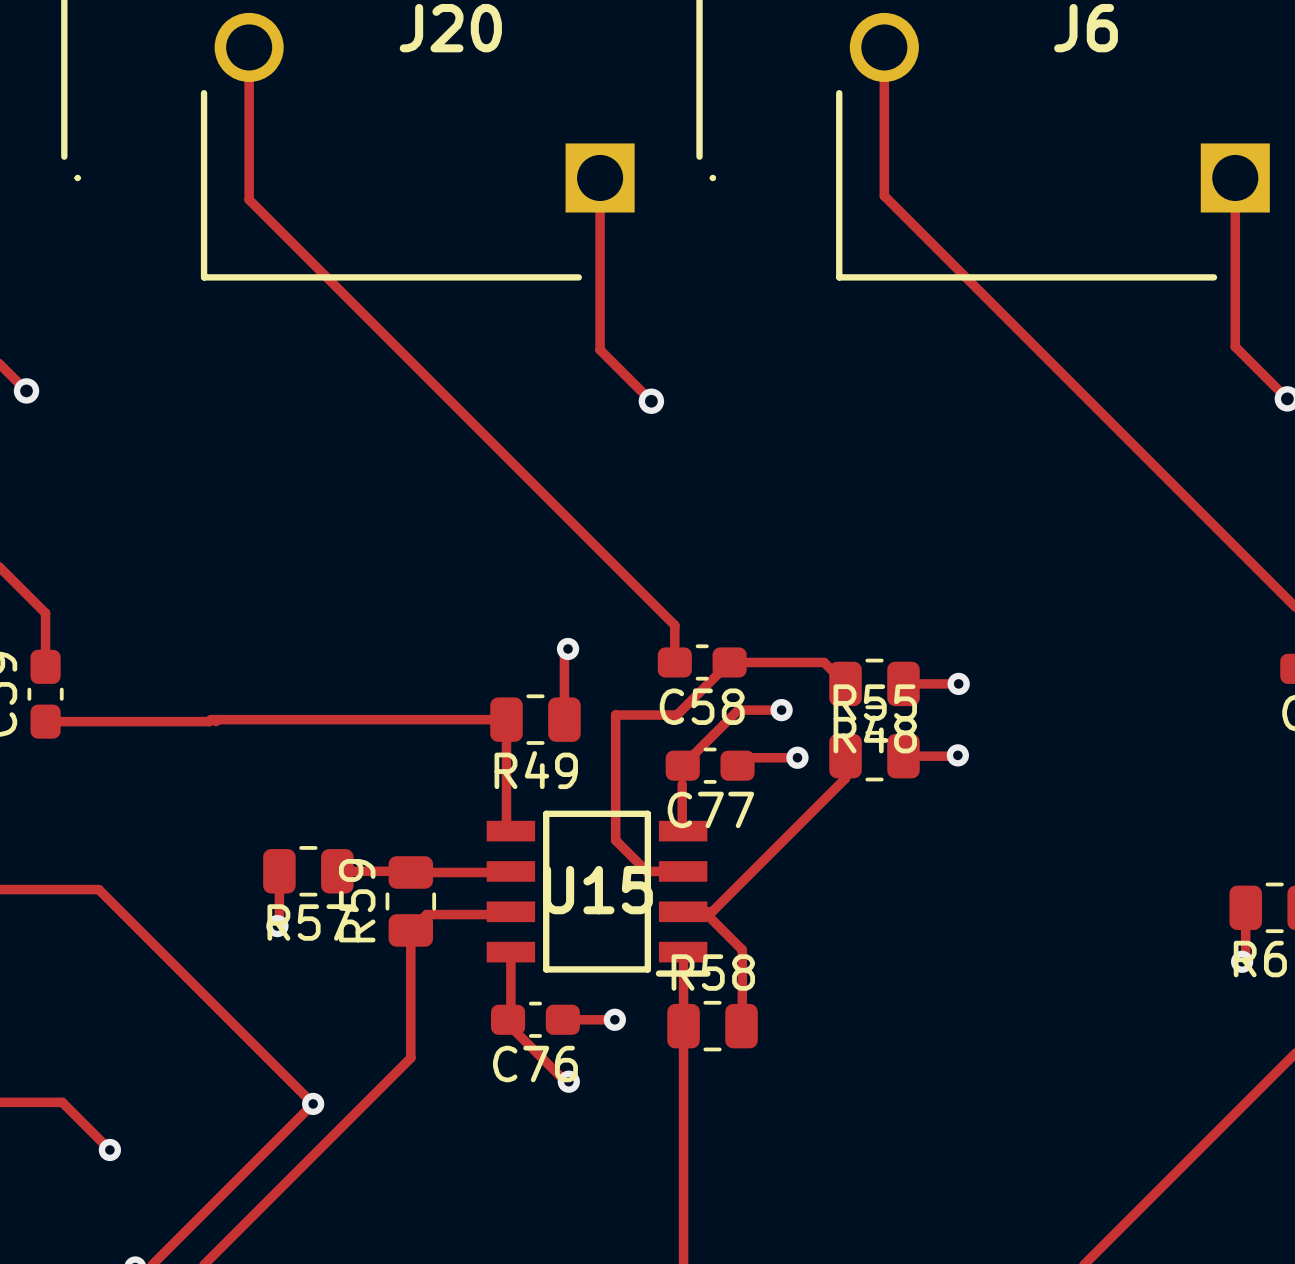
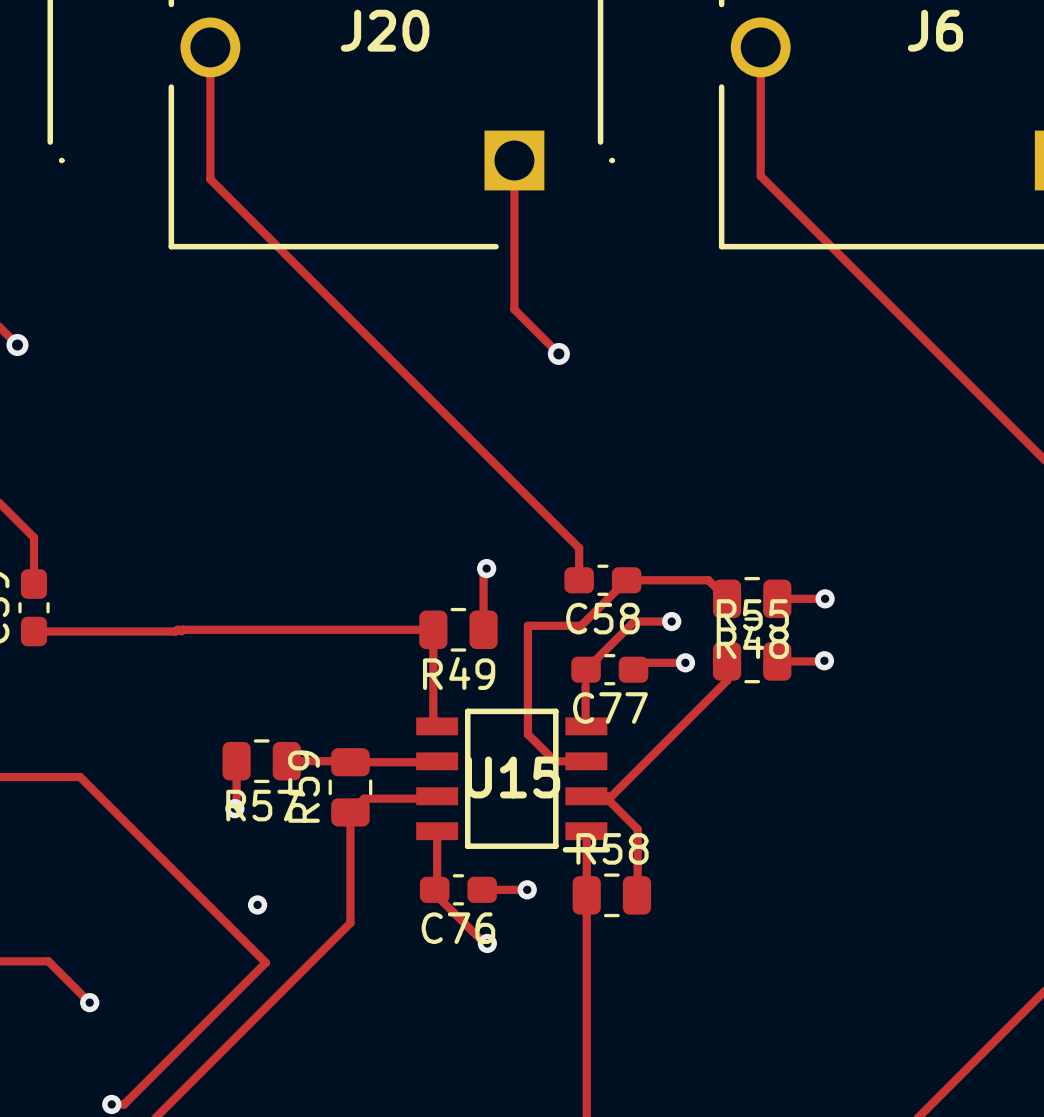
via position: (313, 1103) -> (257, 904)

